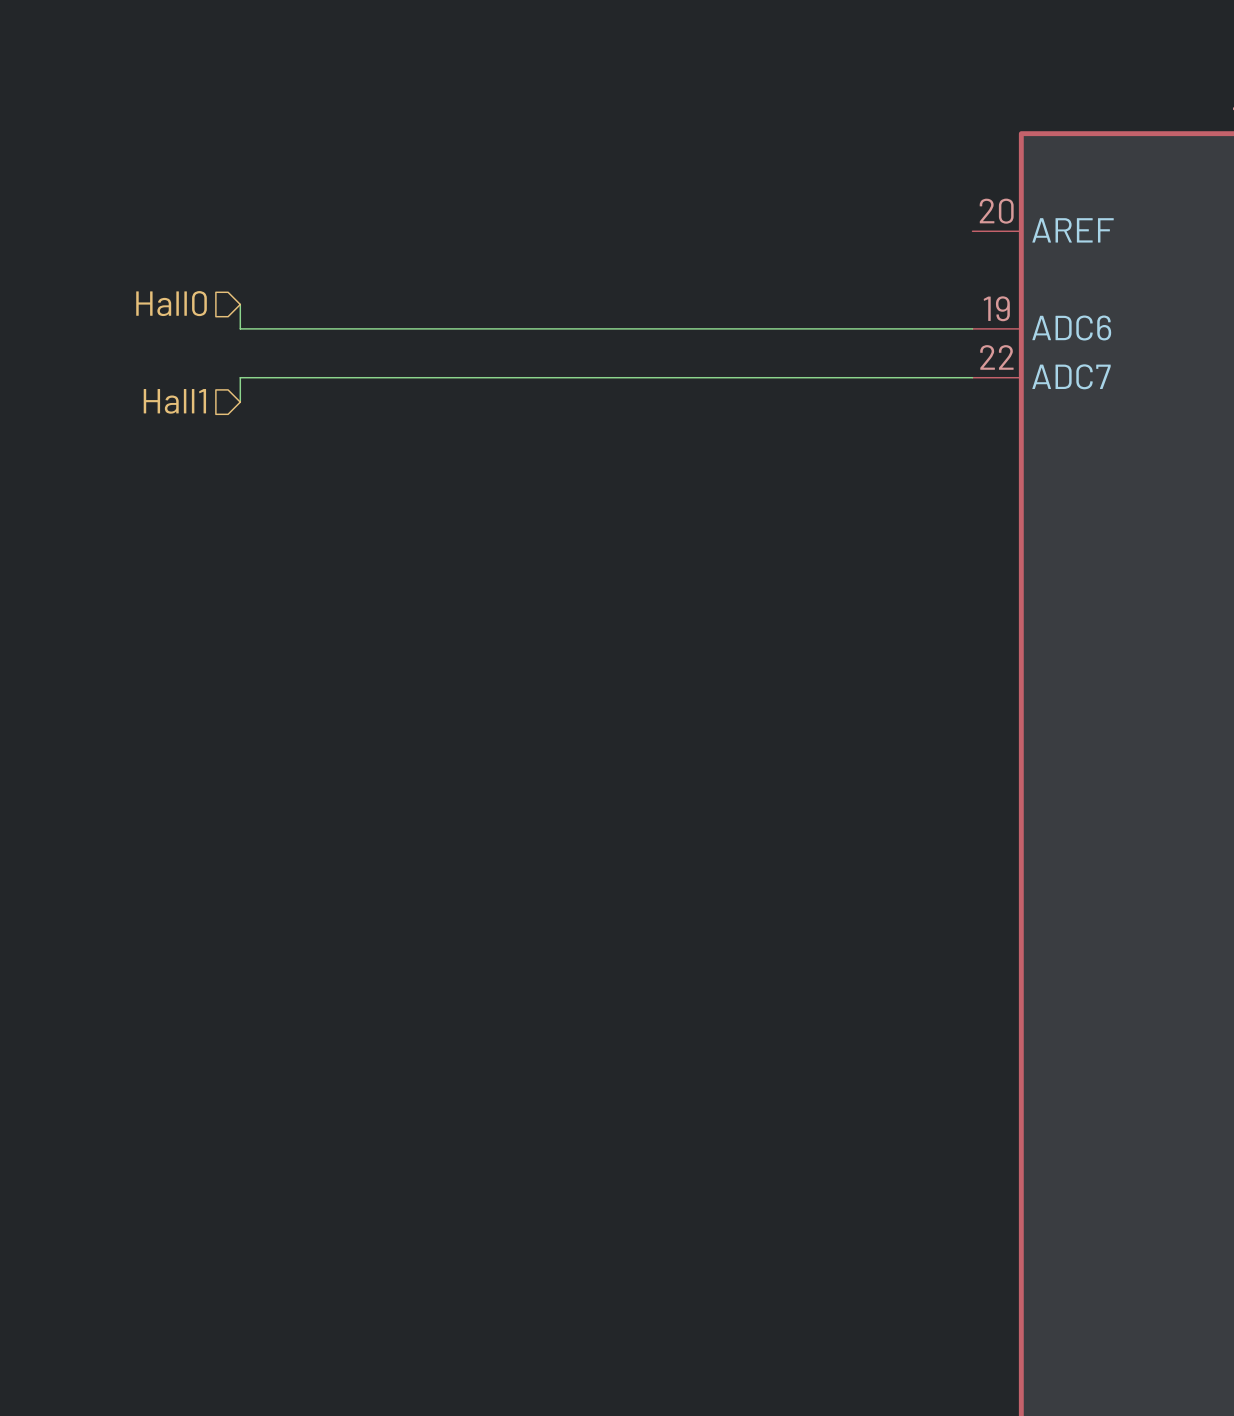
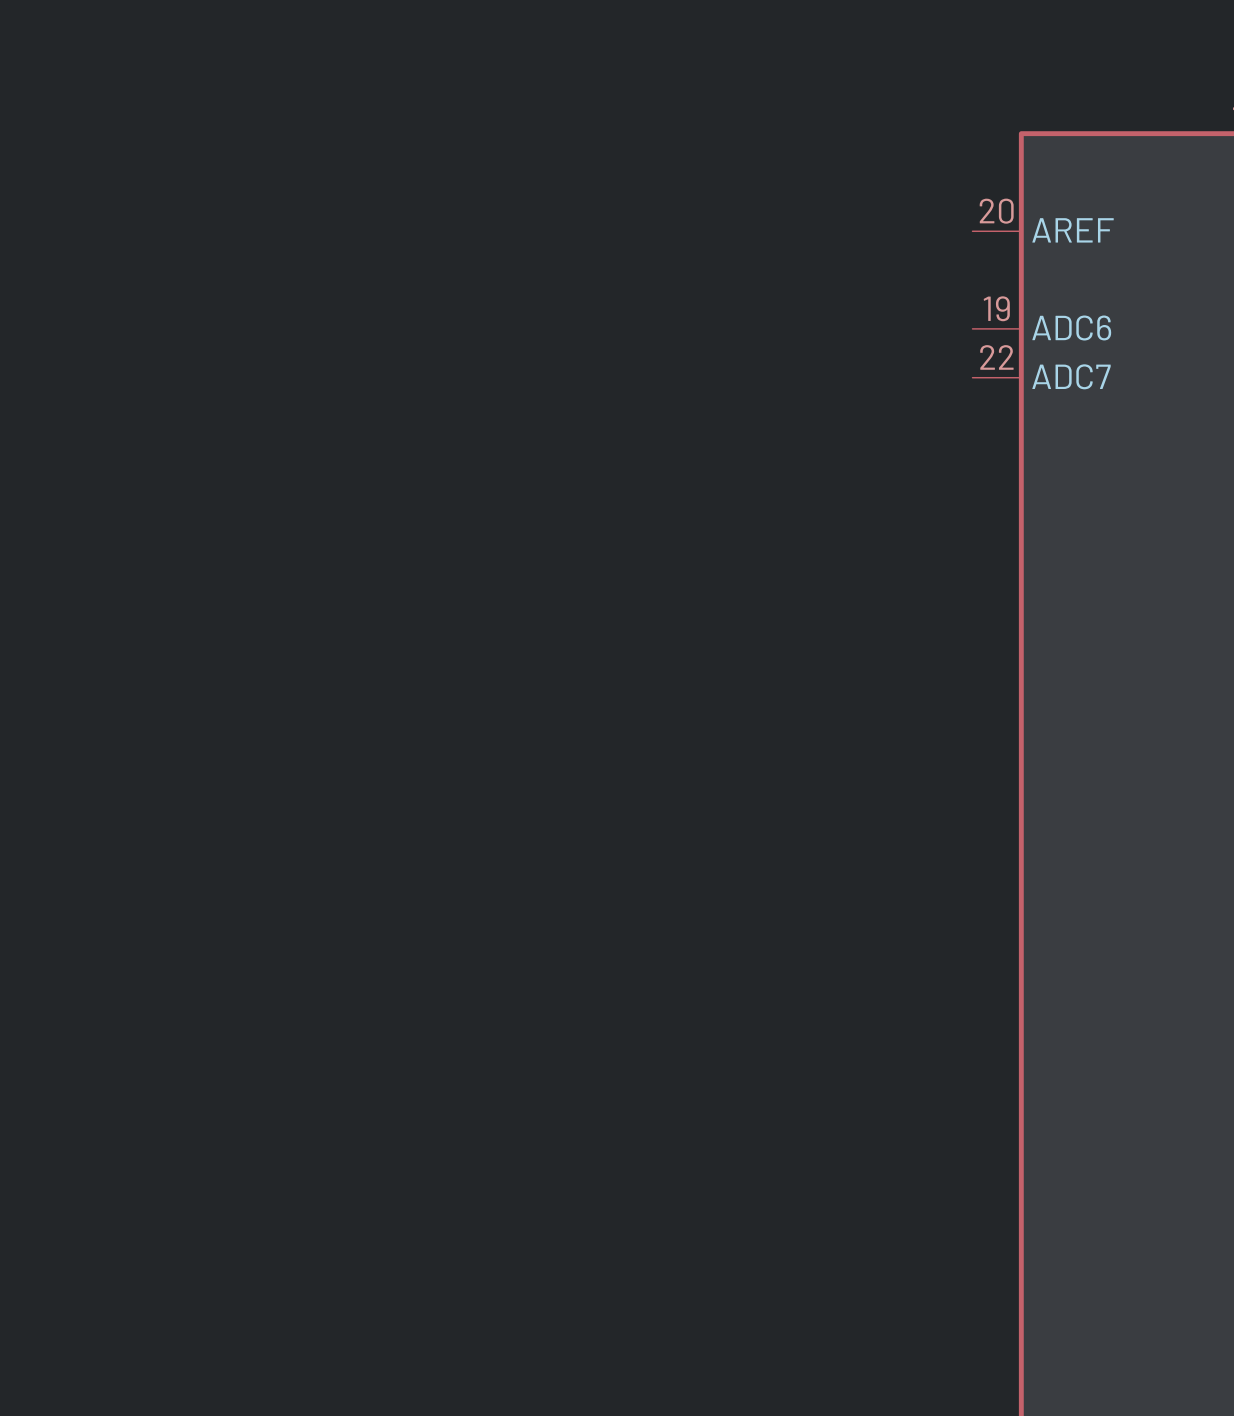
hierarchical label: Hall0 (171, 303) -> none
wire: (240, 304) (240, 328) (972, 328) -> none
wire: (972, 377) (240, 377) (240, 402) -> none
hierarchical label: Hall1 (174, 401) -> none

